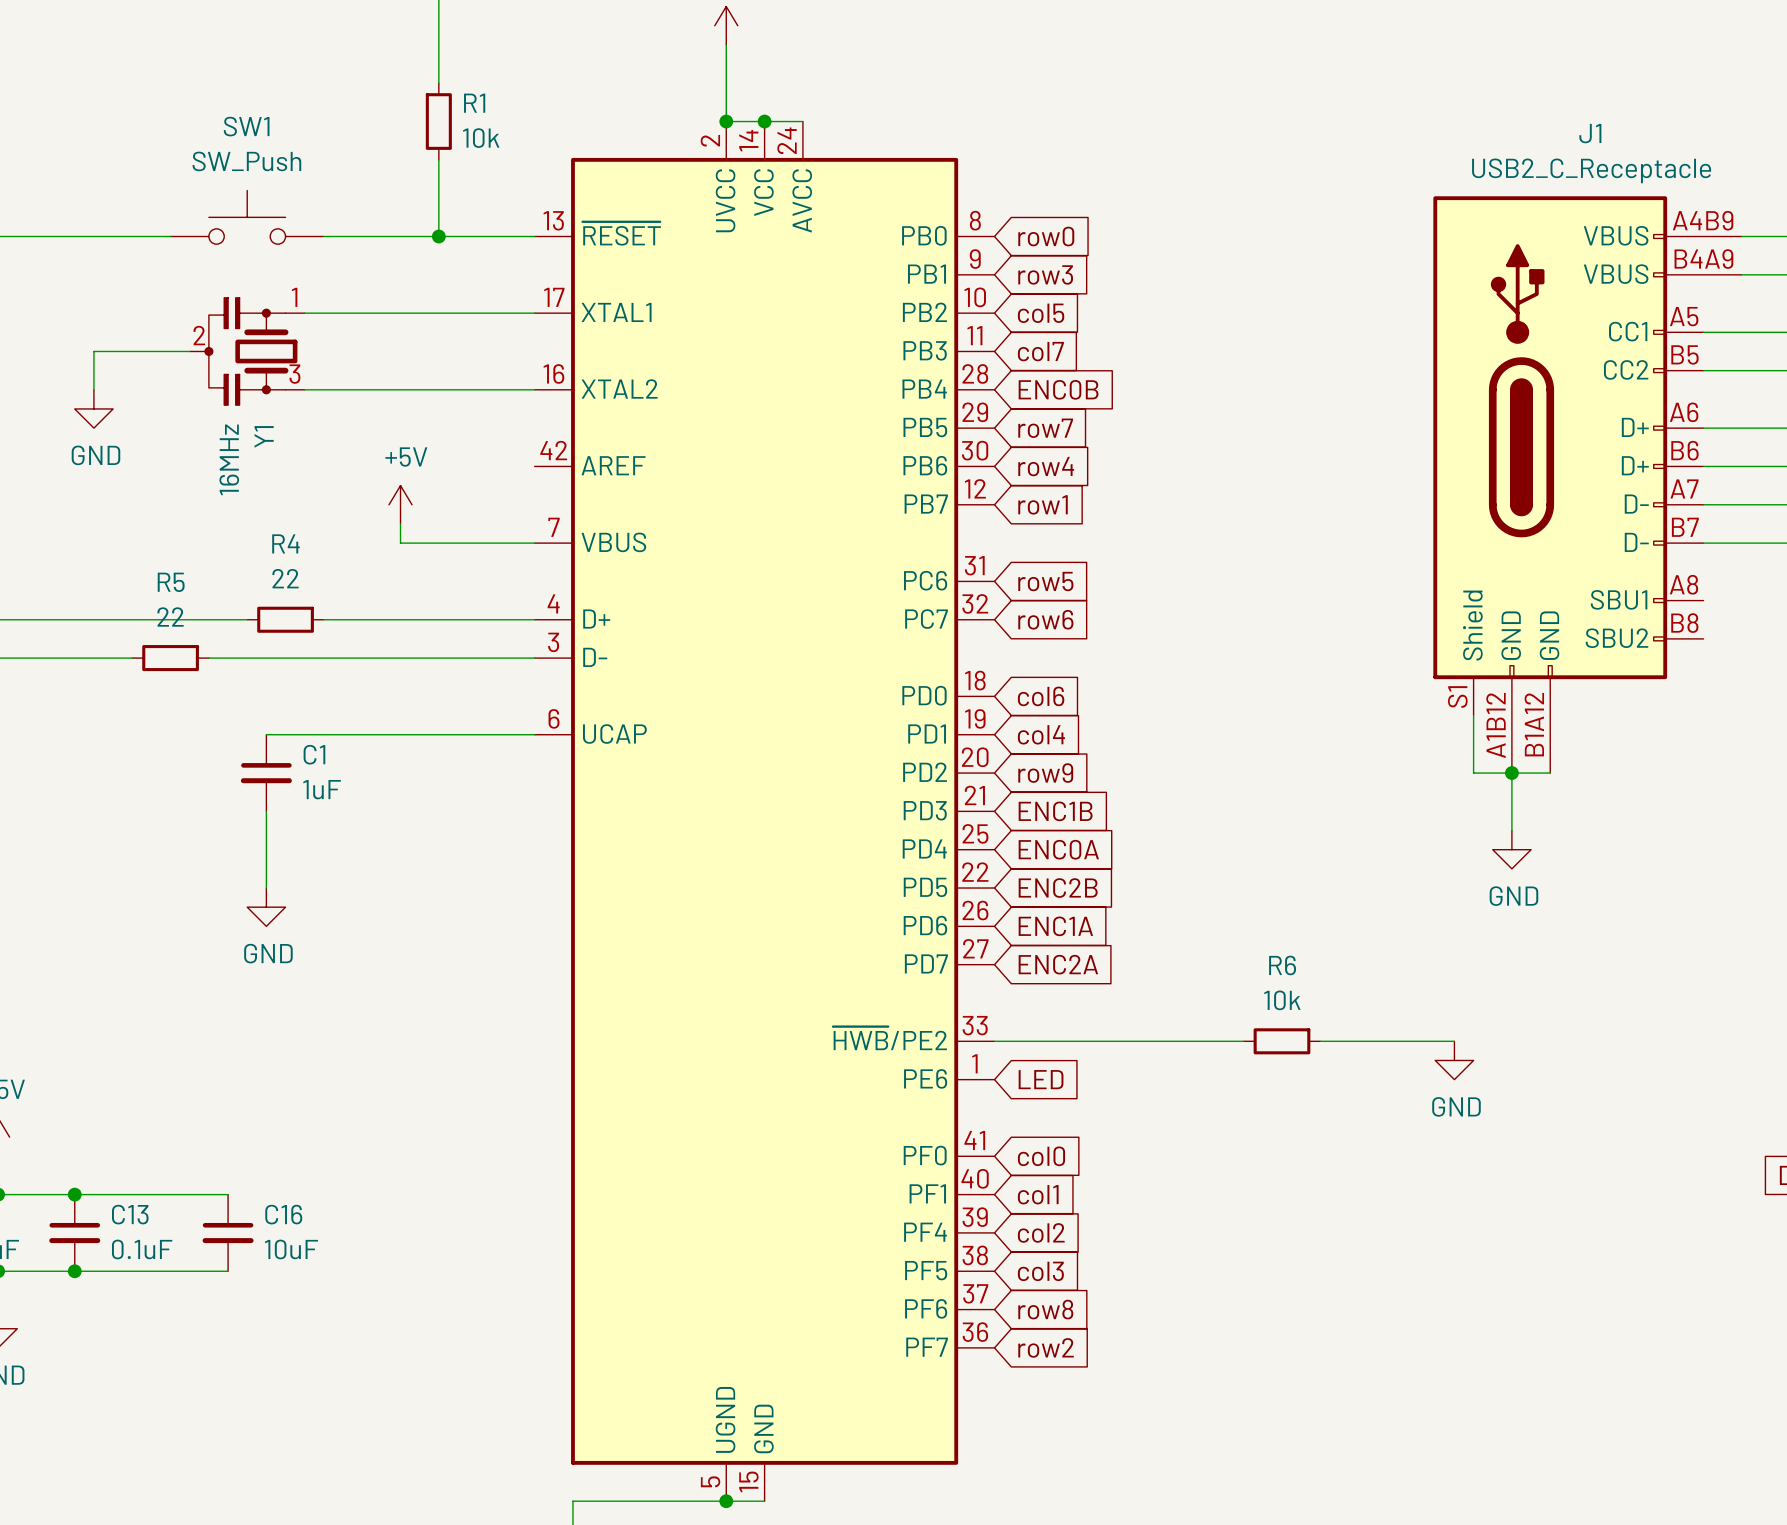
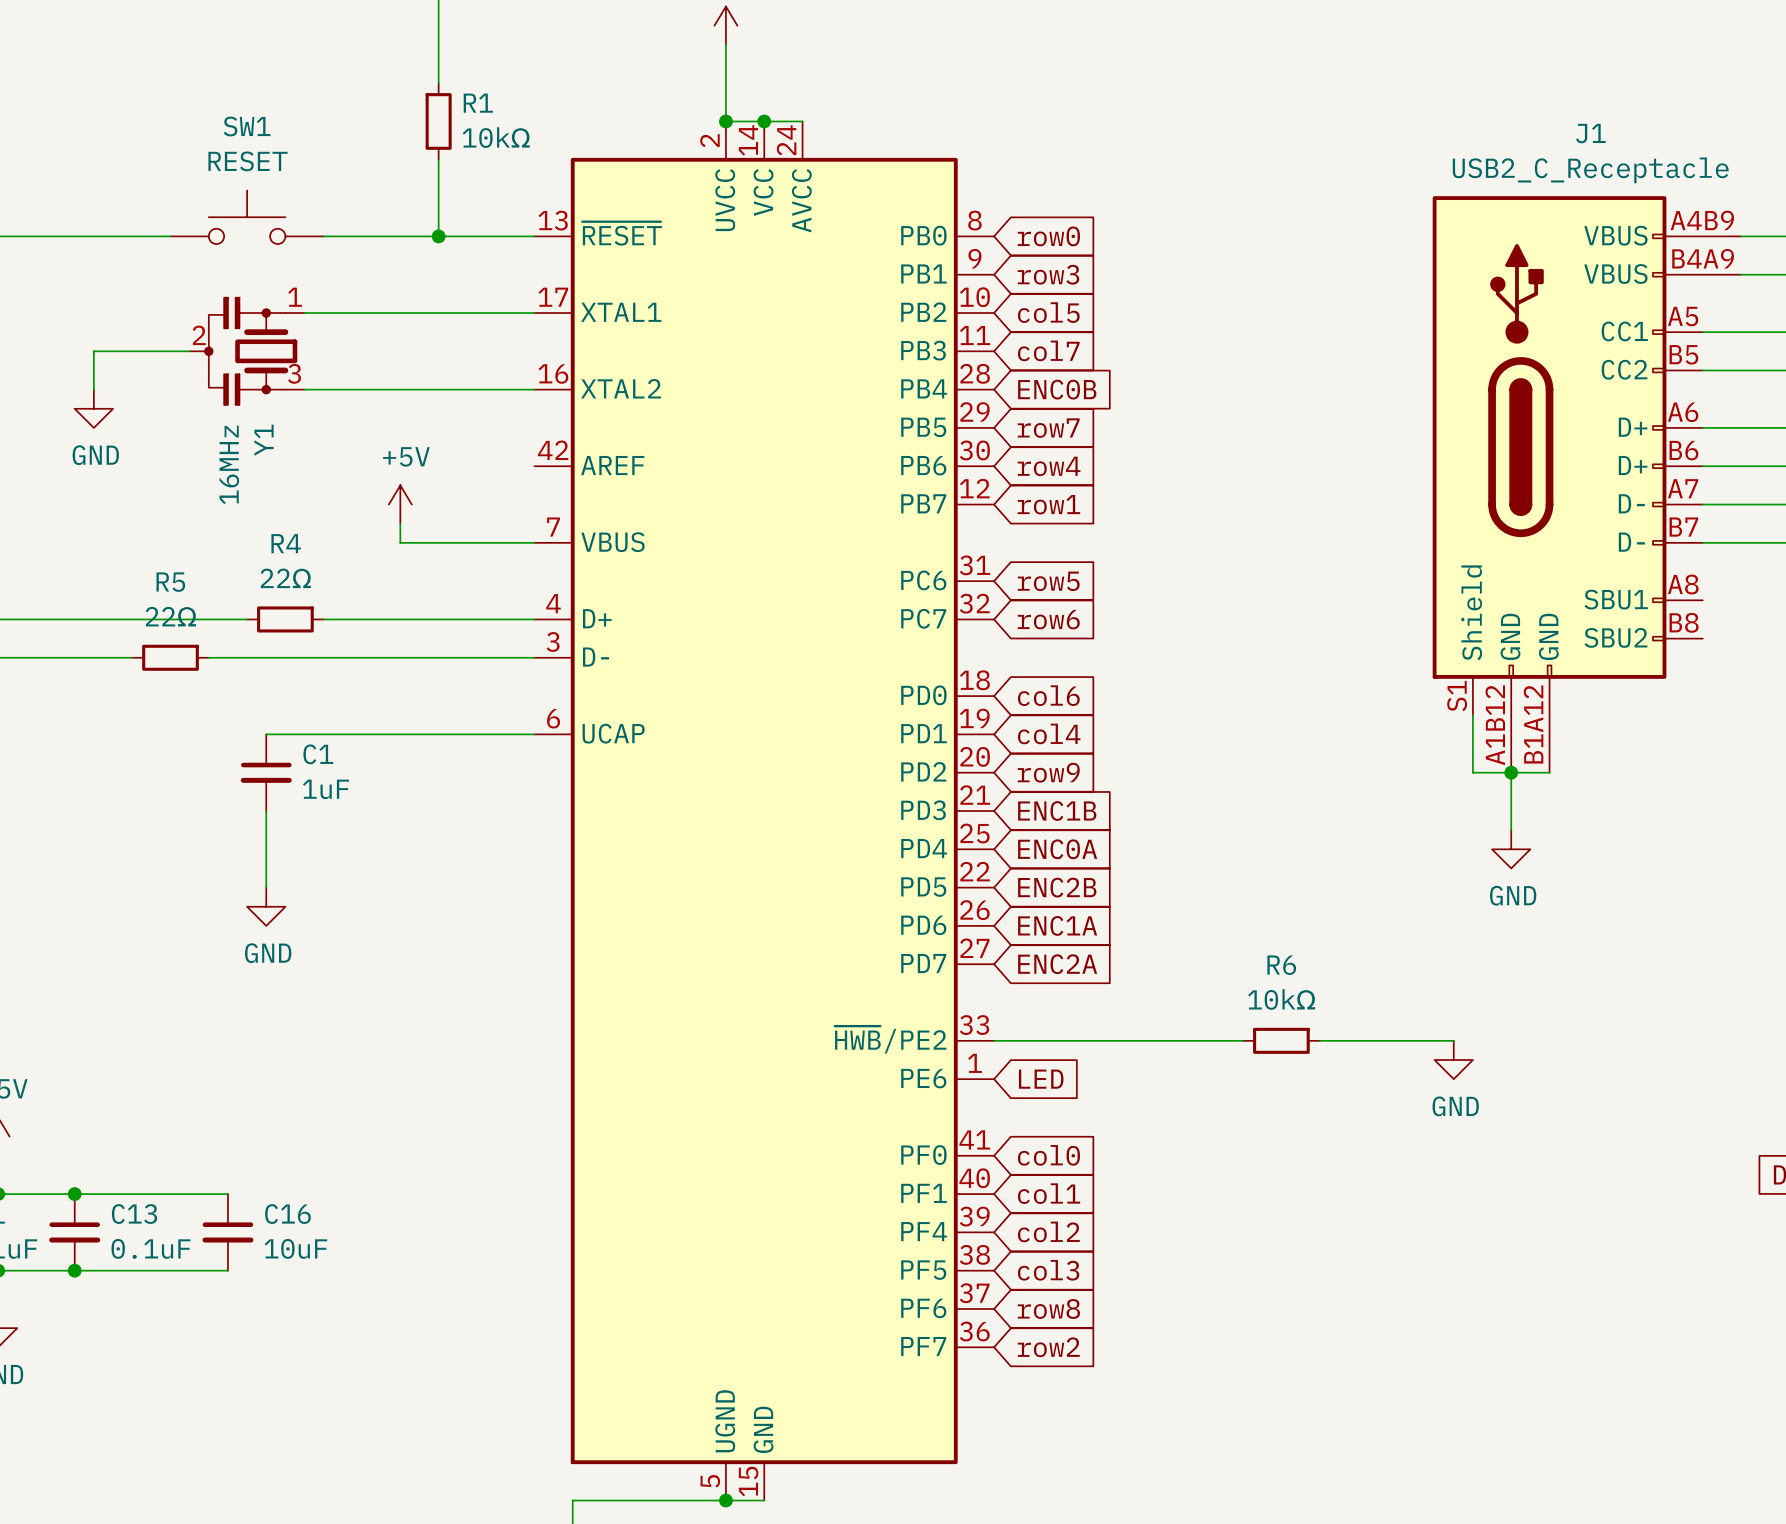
R1 value: 10k (481, 138) -> 10kΩ (496, 137)
SW1 value: SW_Push (246, 161) -> RESET (248, 161)
R4 value: 22 (285, 578) -> 22Ω (285, 578)
R5 value: 22 (170, 617) -> 22Ω (170, 616)
R6 value: 10k (1282, 1000) -> 10kΩ (1281, 999)

